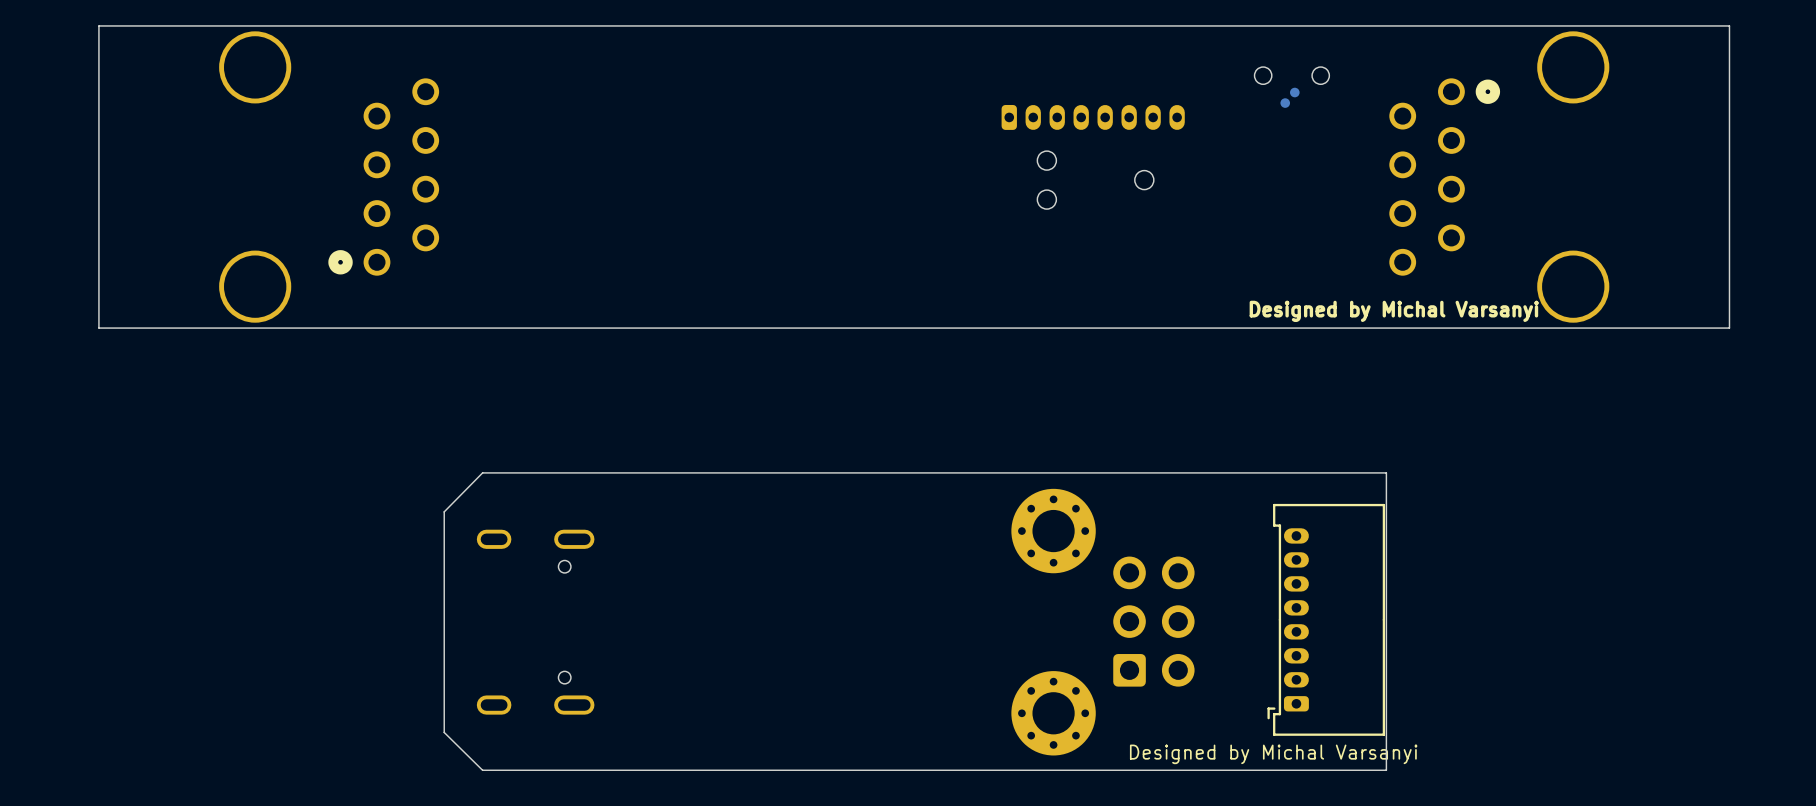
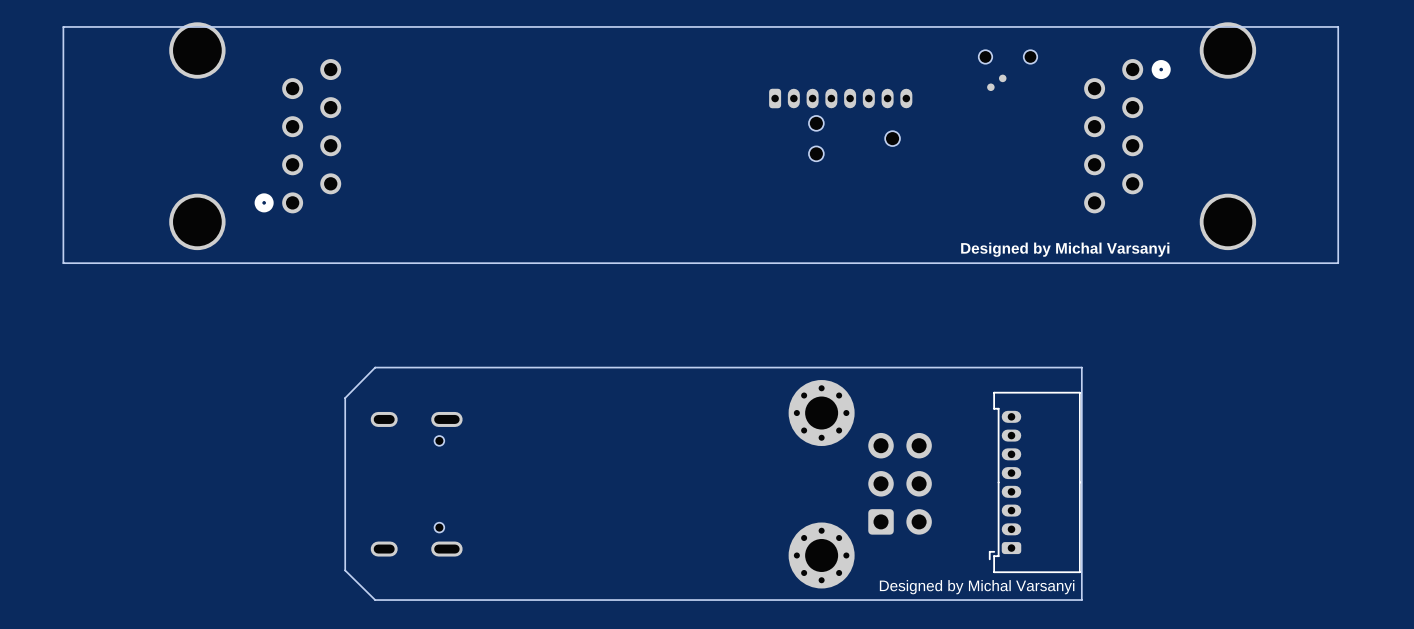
board edge: (1729, 25) (98, 25) (98, 328) (1729, 328) (1729, 25) -> (1338, 26) (63, 26) (63, 263) (1338, 263) (1338, 26)
part position: (1294, 92) -> (990, 87)
part position: (1093, 117) -> (840, 98)
text position: Designed by Michal Varsanyi (1394, 311) -> Designed by Michal Varsanyi (1065, 249)

